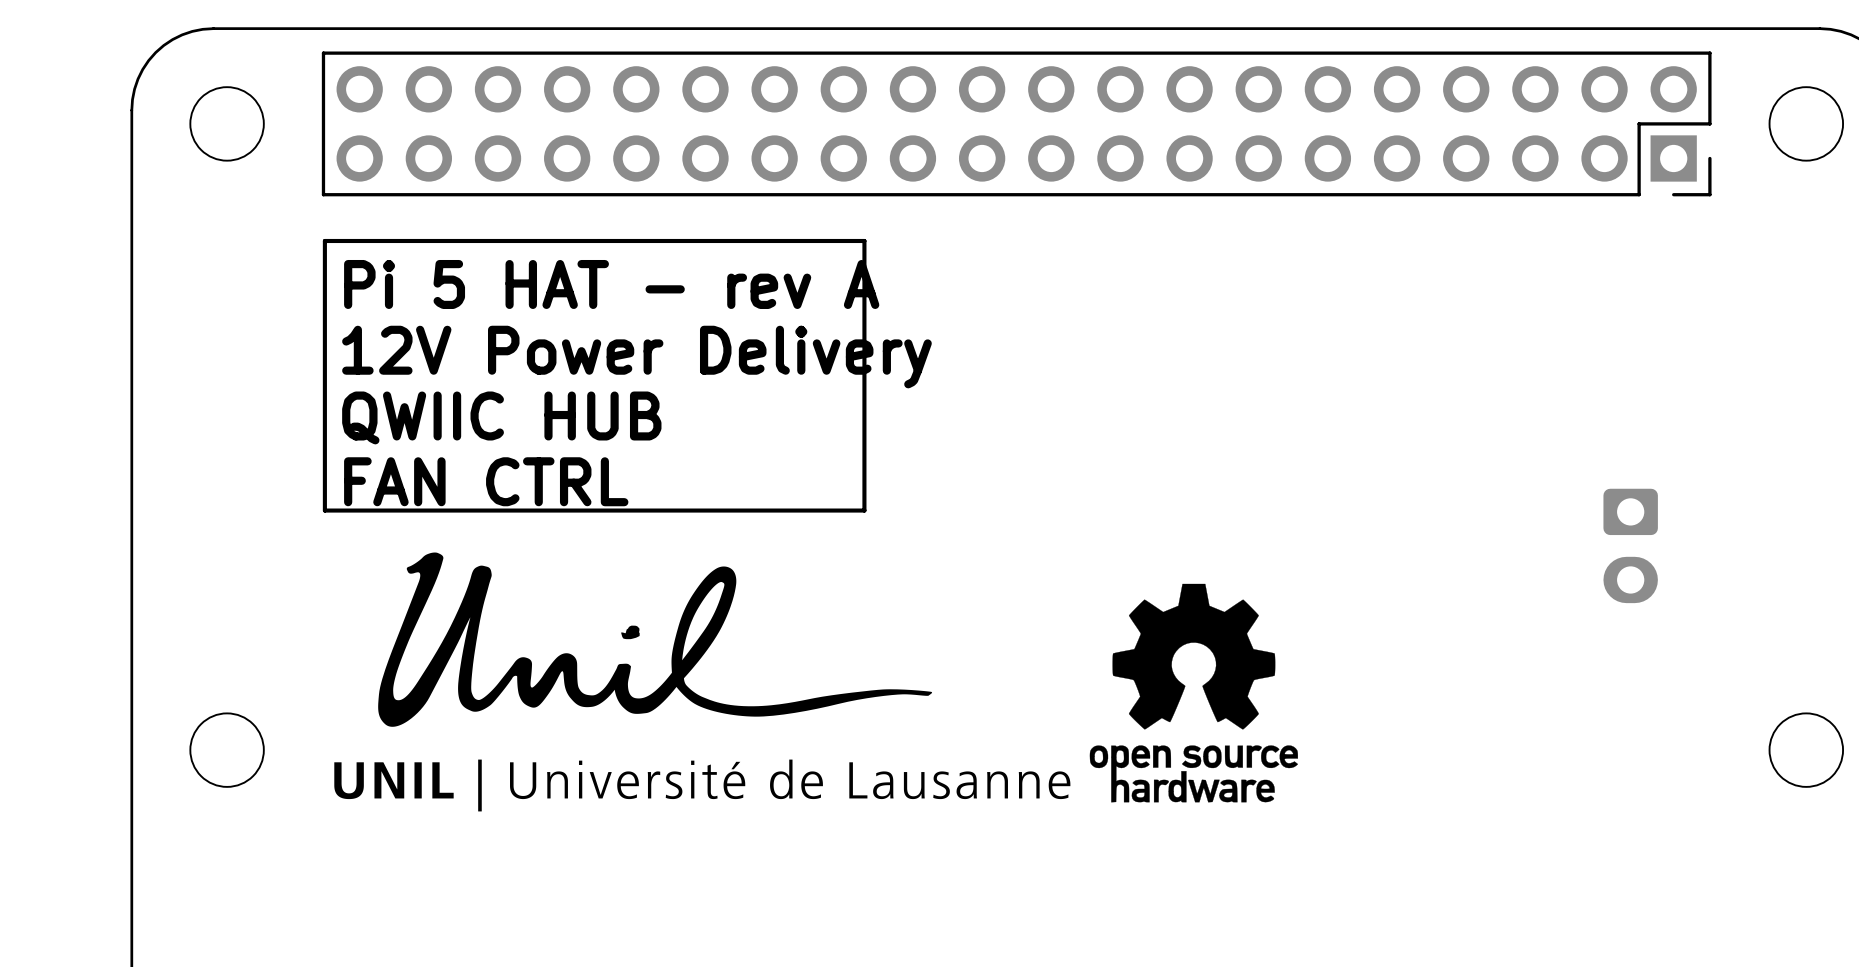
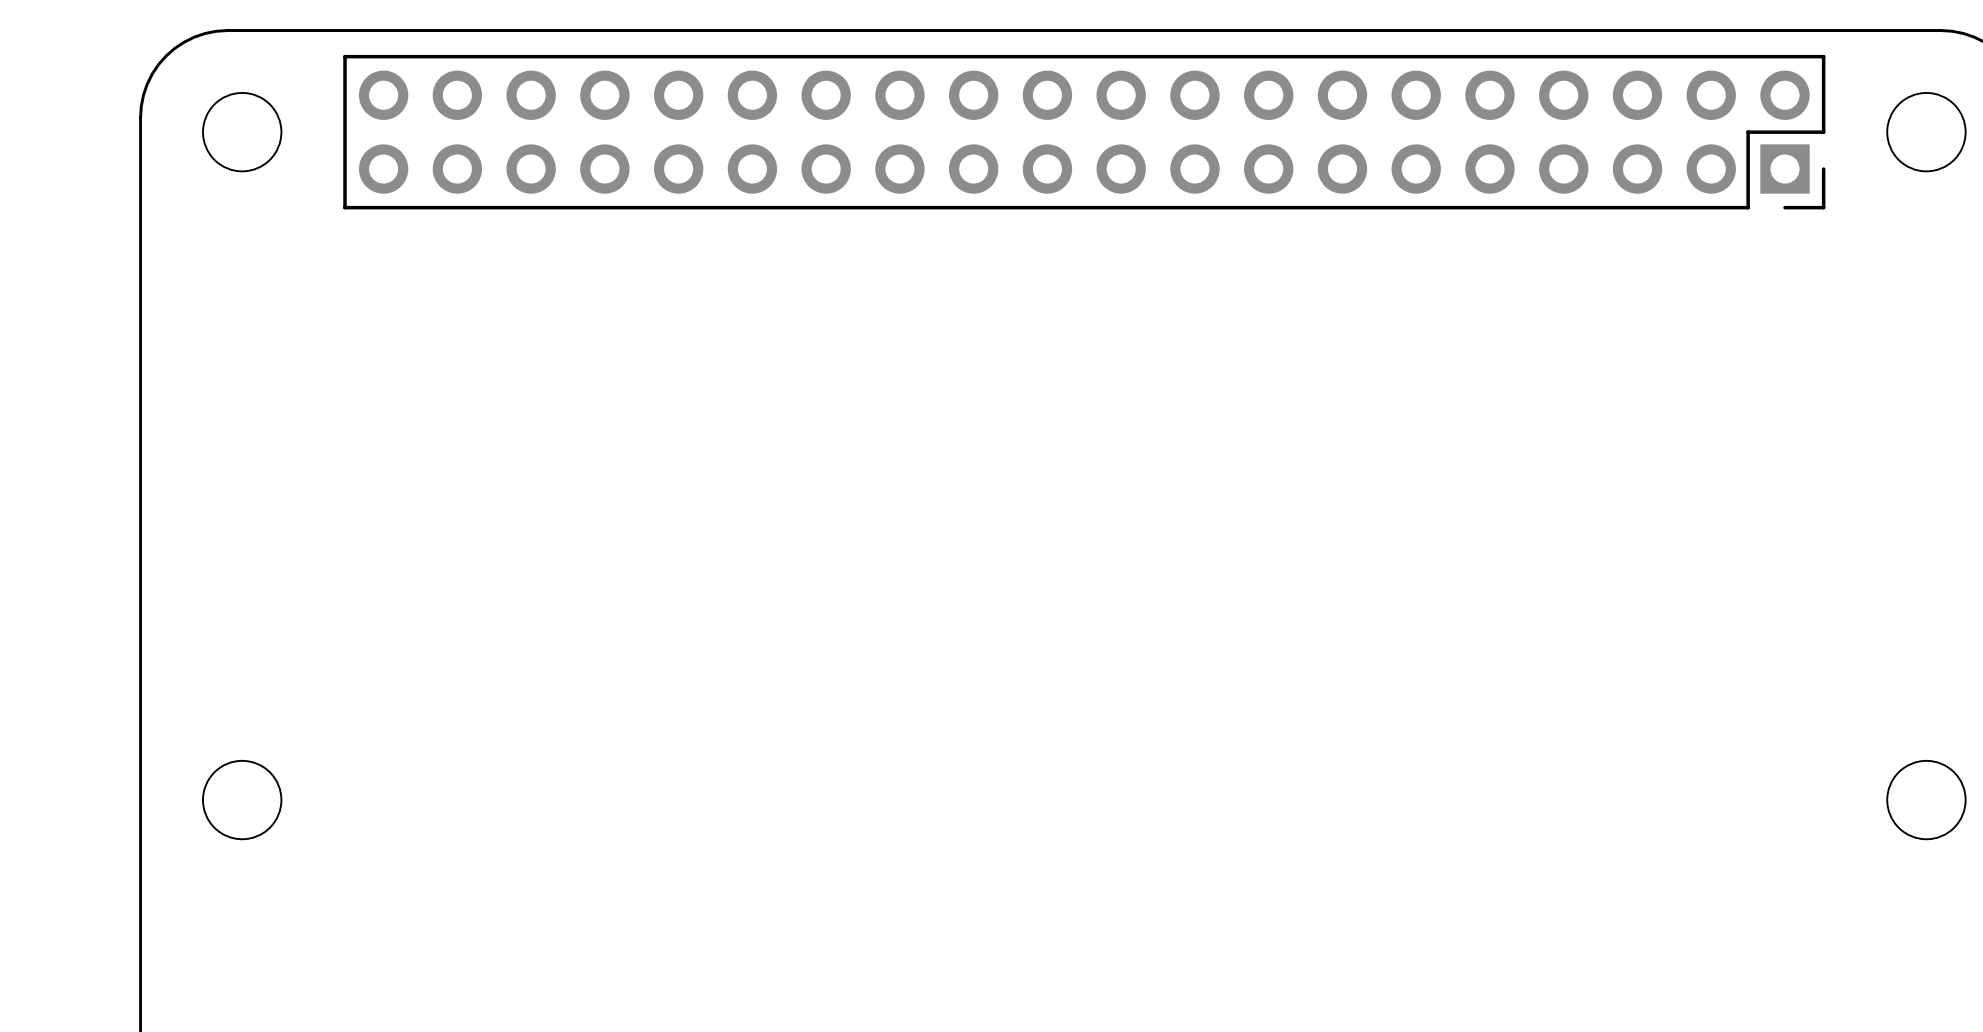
line: (864, 240) (324, 240) (324, 510) (864, 510) (864, 240) -> none
text: Pi 5 HAT - rev A (611, 284) -> none
text: 12V Power Delivery (636, 357) -> none
text: QWIIC HUB (501, 417) -> none
text: FAN CTRL (486, 481) -> none
part: (1630, 545) -> none
drawing: [378, 552, 933, 727] -> none
drawing: [334, 583, 1299, 812] -> none

